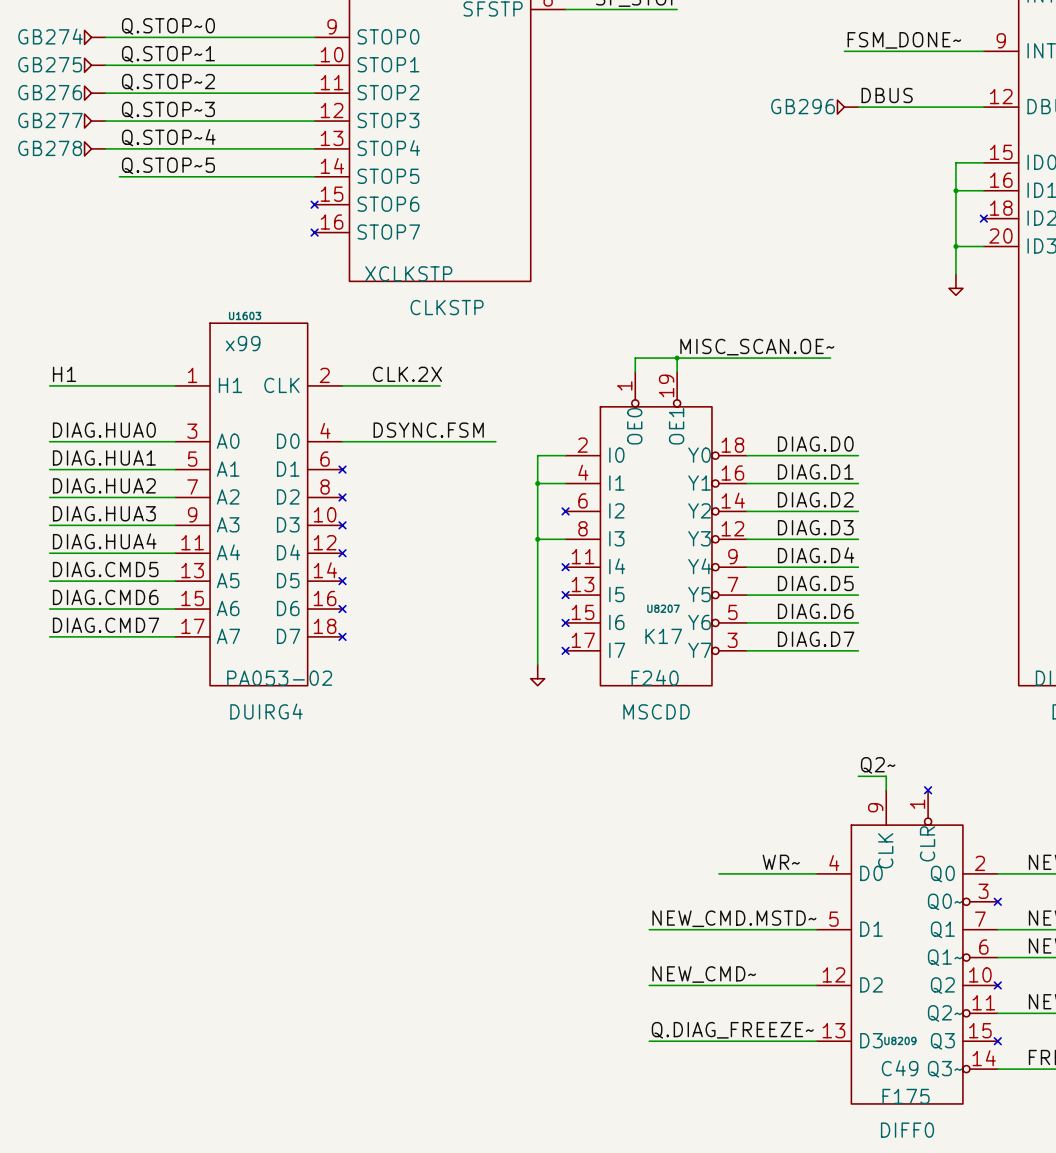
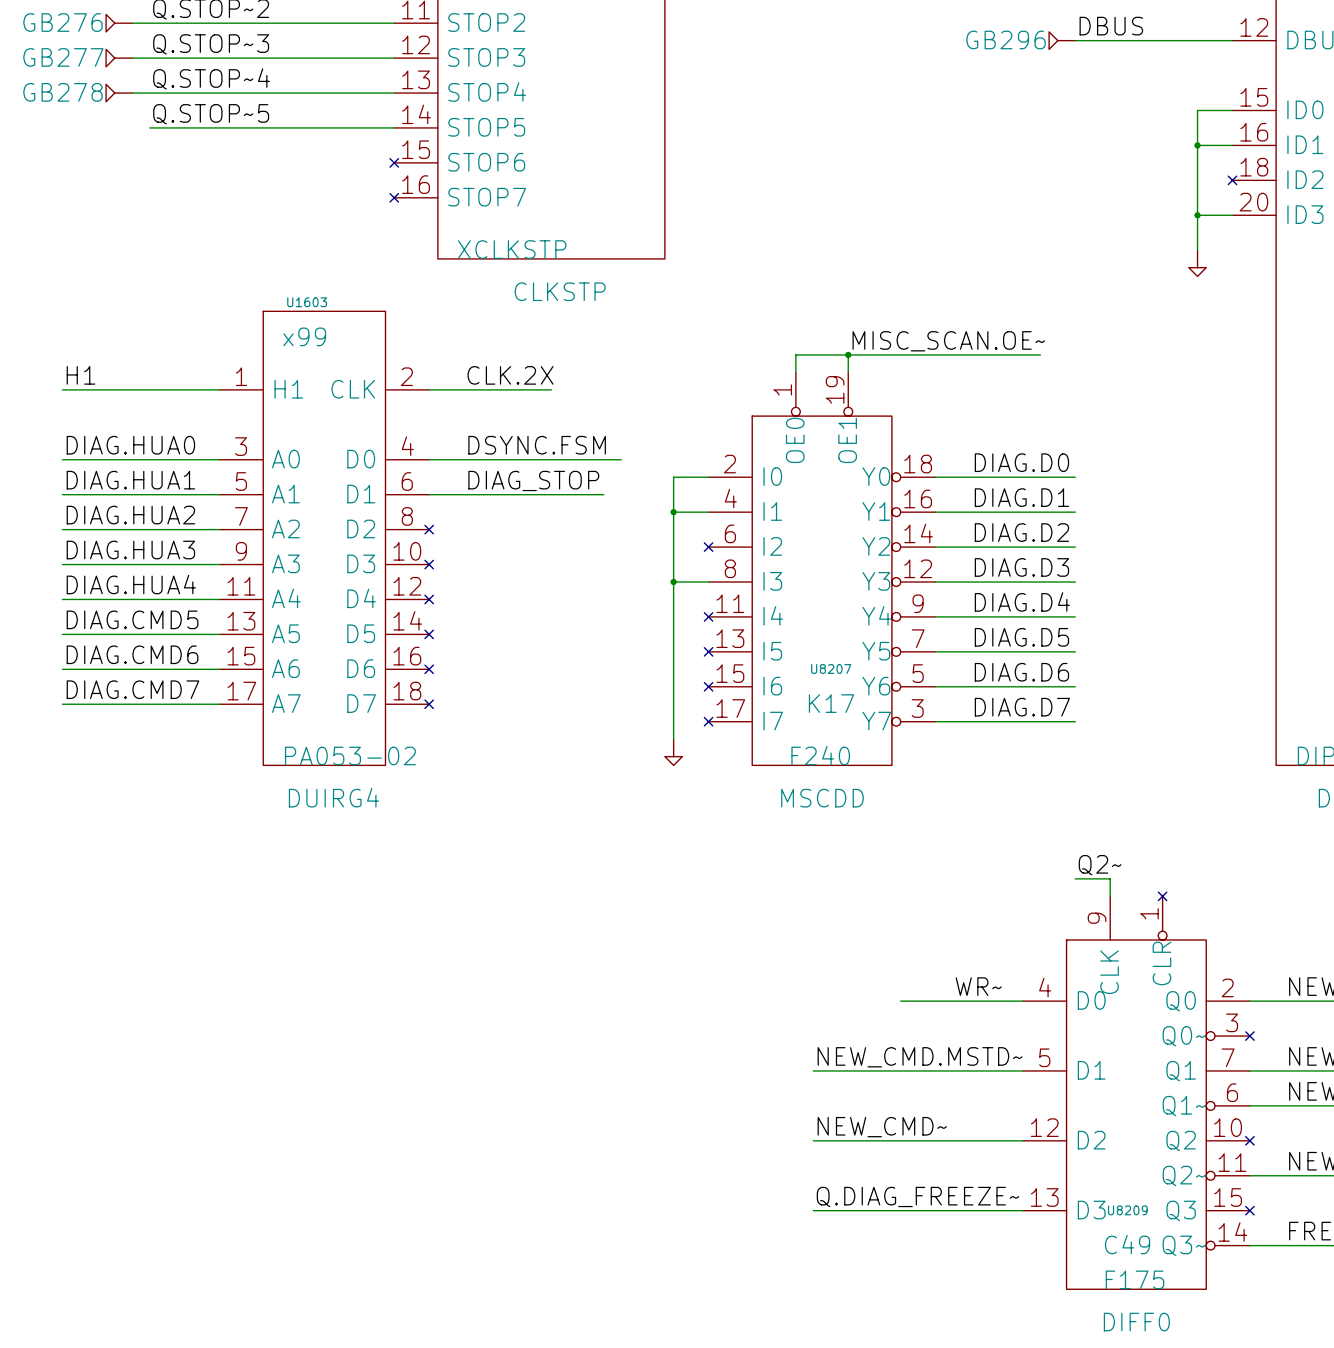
label: none -> DIAG_STOP (533, 480)
wire: none -> (429, 494) (603, 494)
no-connect mark: (342, 469) -> none

